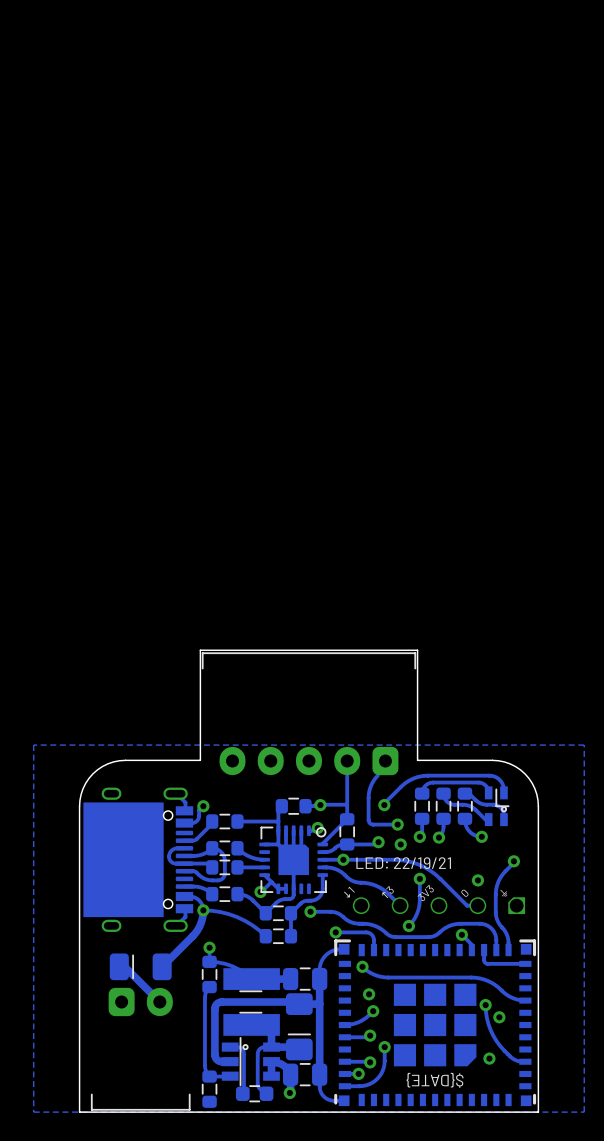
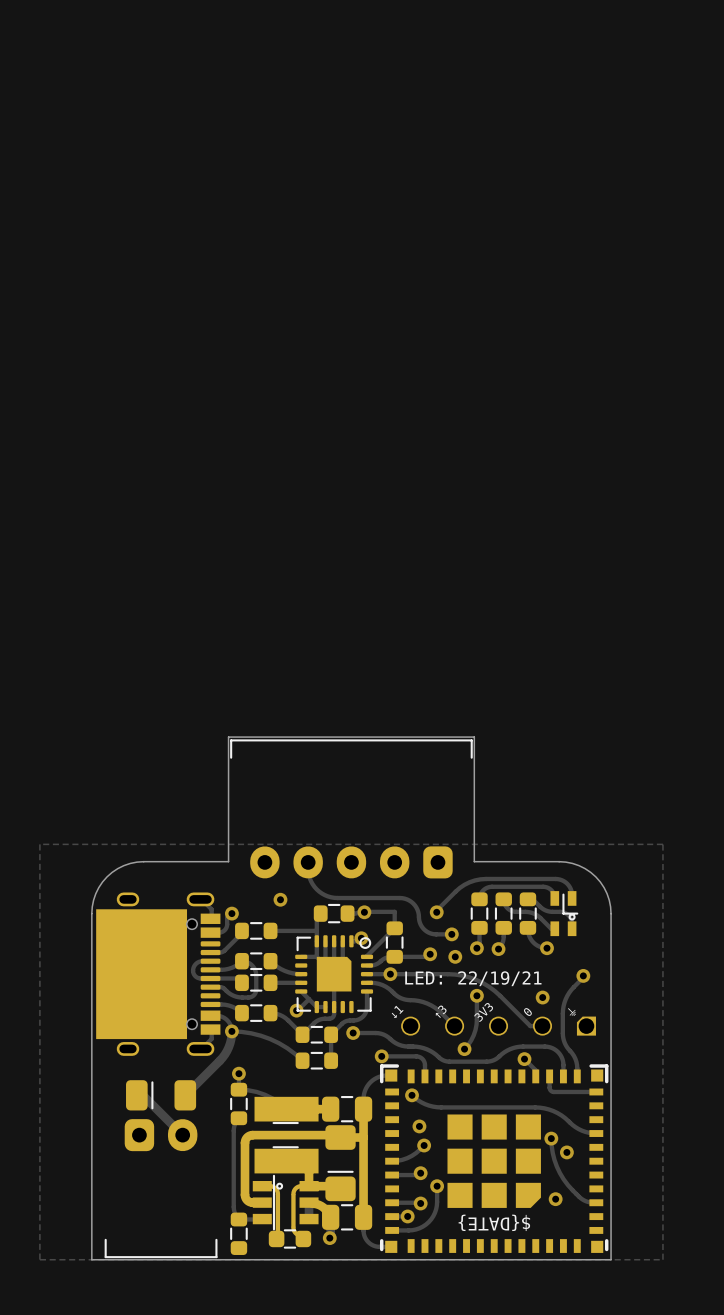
track: (347, 761) (347, 804) -> none
track: (377, 775) (369, 791) (368, 820) (372, 824) (383, 824) -> (308, 868) (309, 878) (314, 886) (327, 896) (399, 898) (409, 900) (417, 909) (422, 927) (428, 932) (436, 934)
via: none -> (280, 899)

